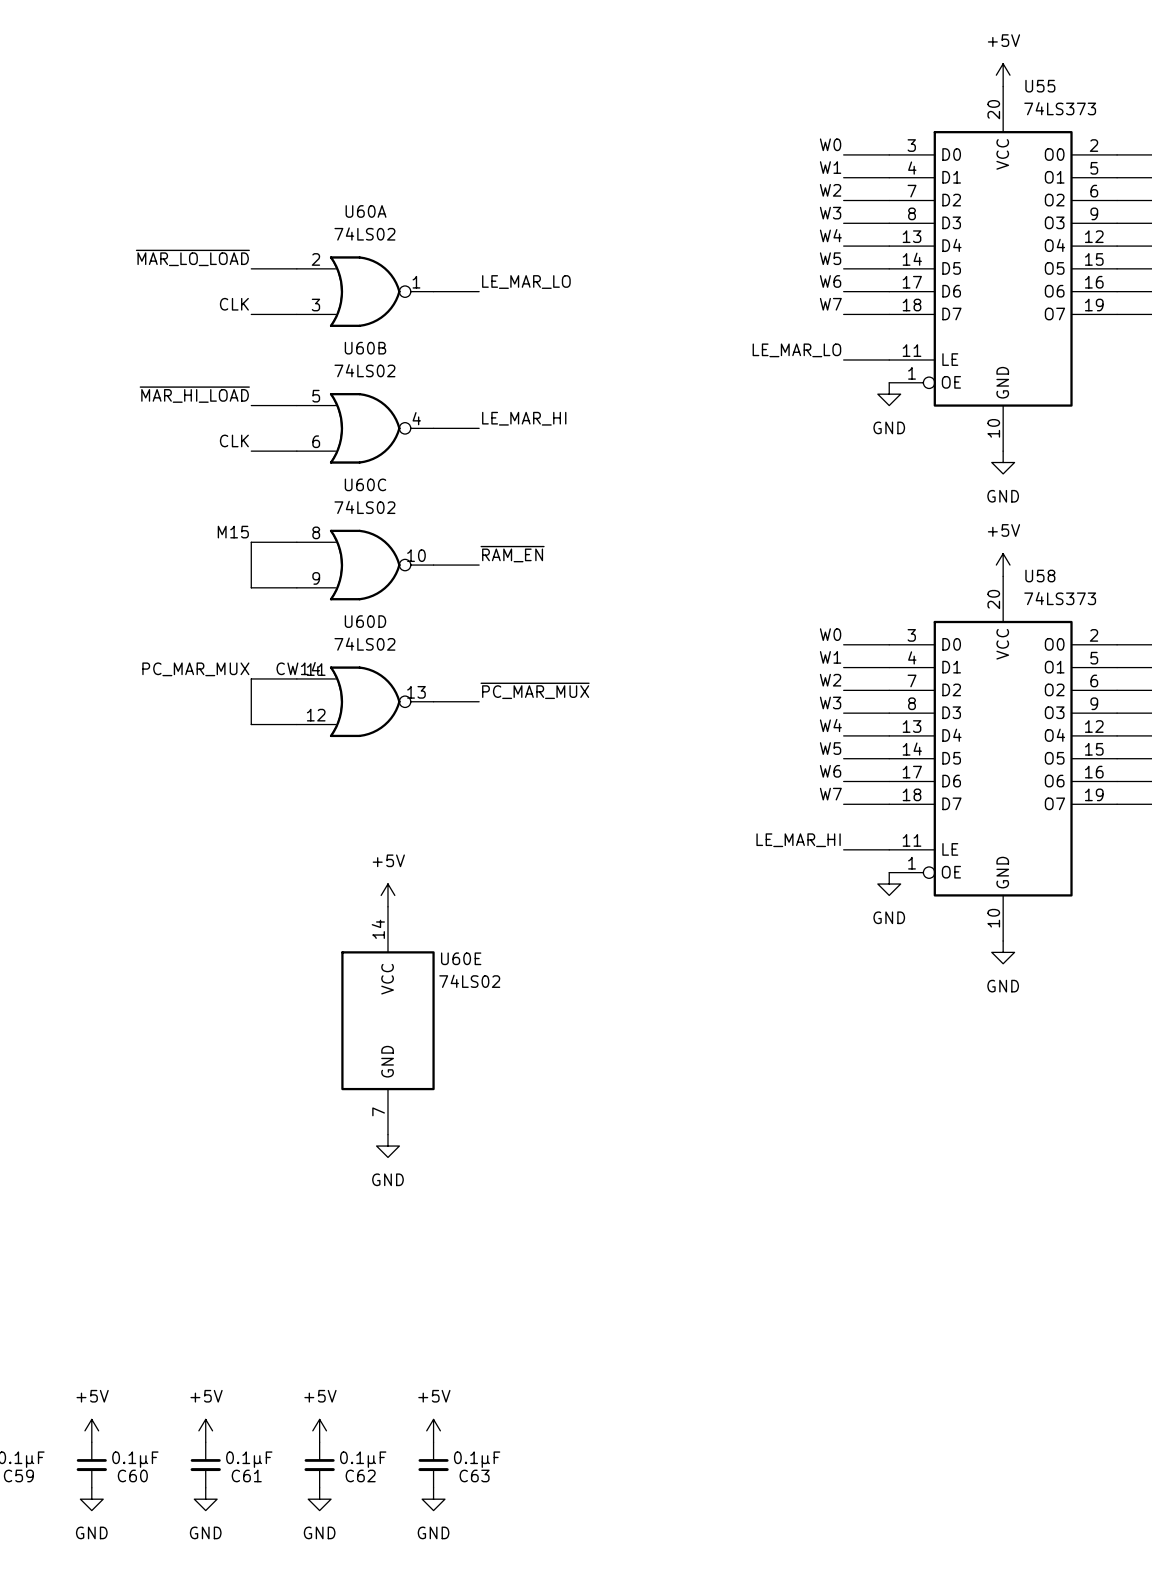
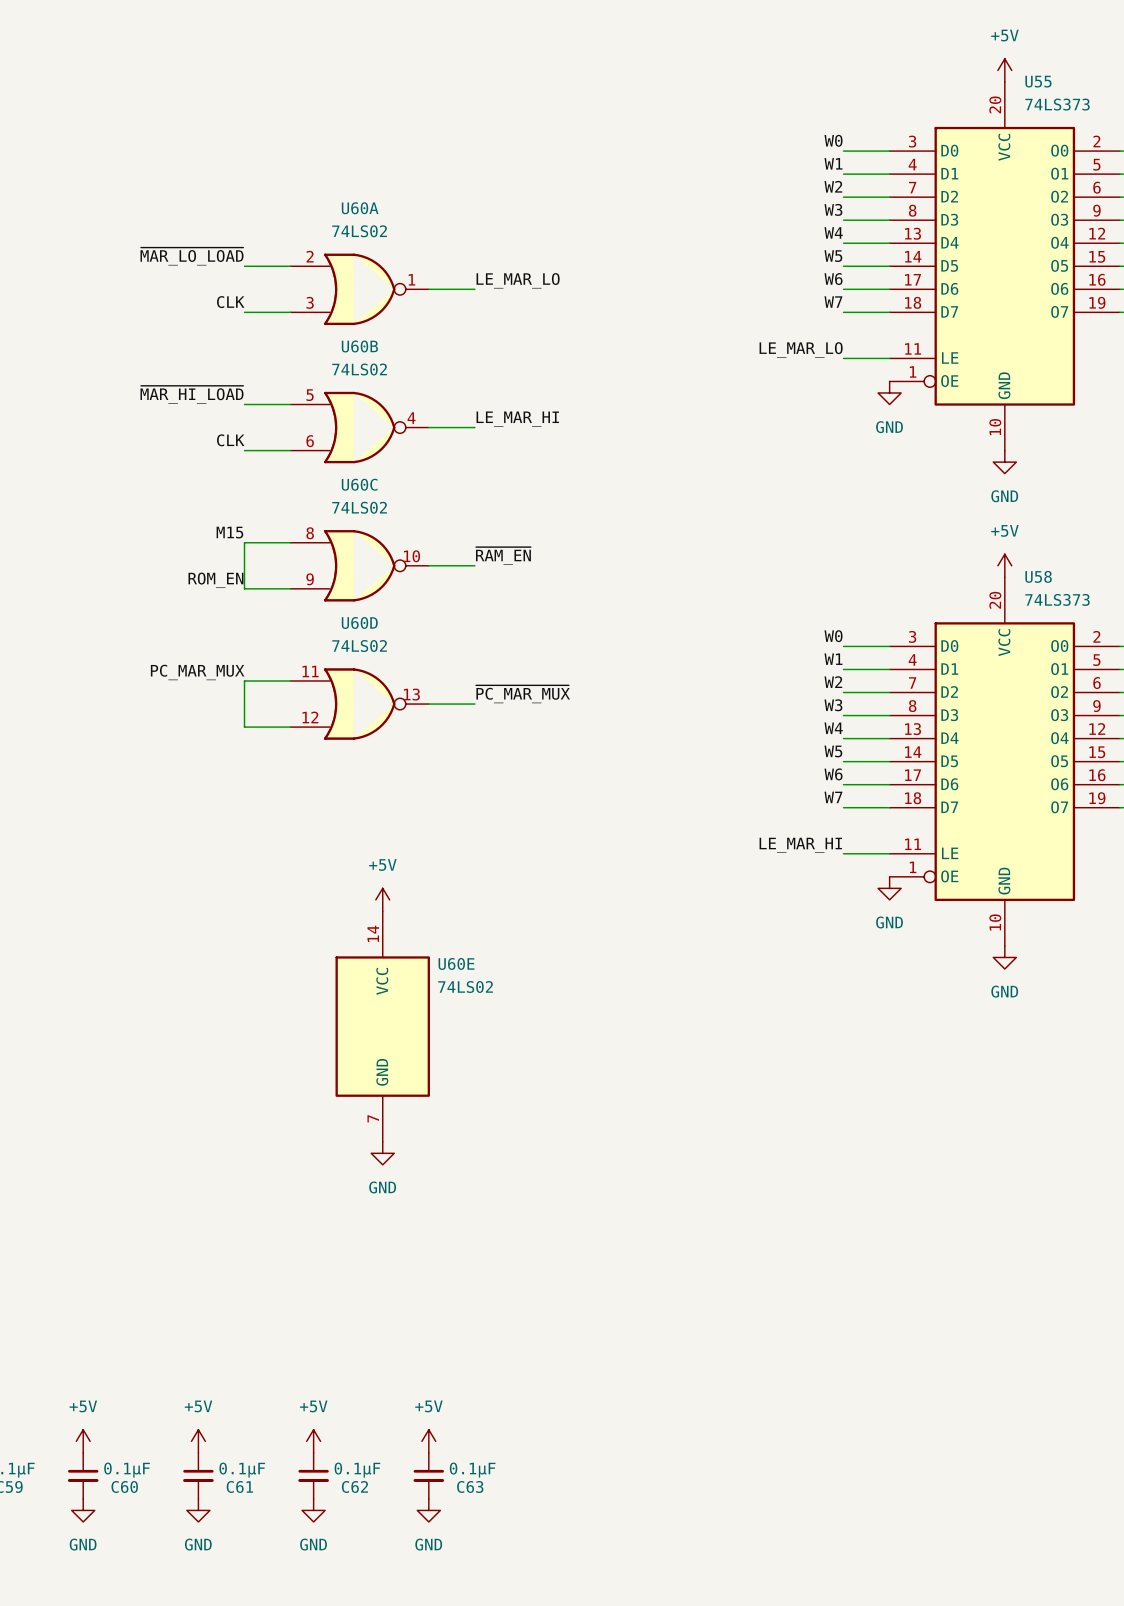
label: none -> ROM_EN (215, 580)
label: CW14 (298, 668) -> none

